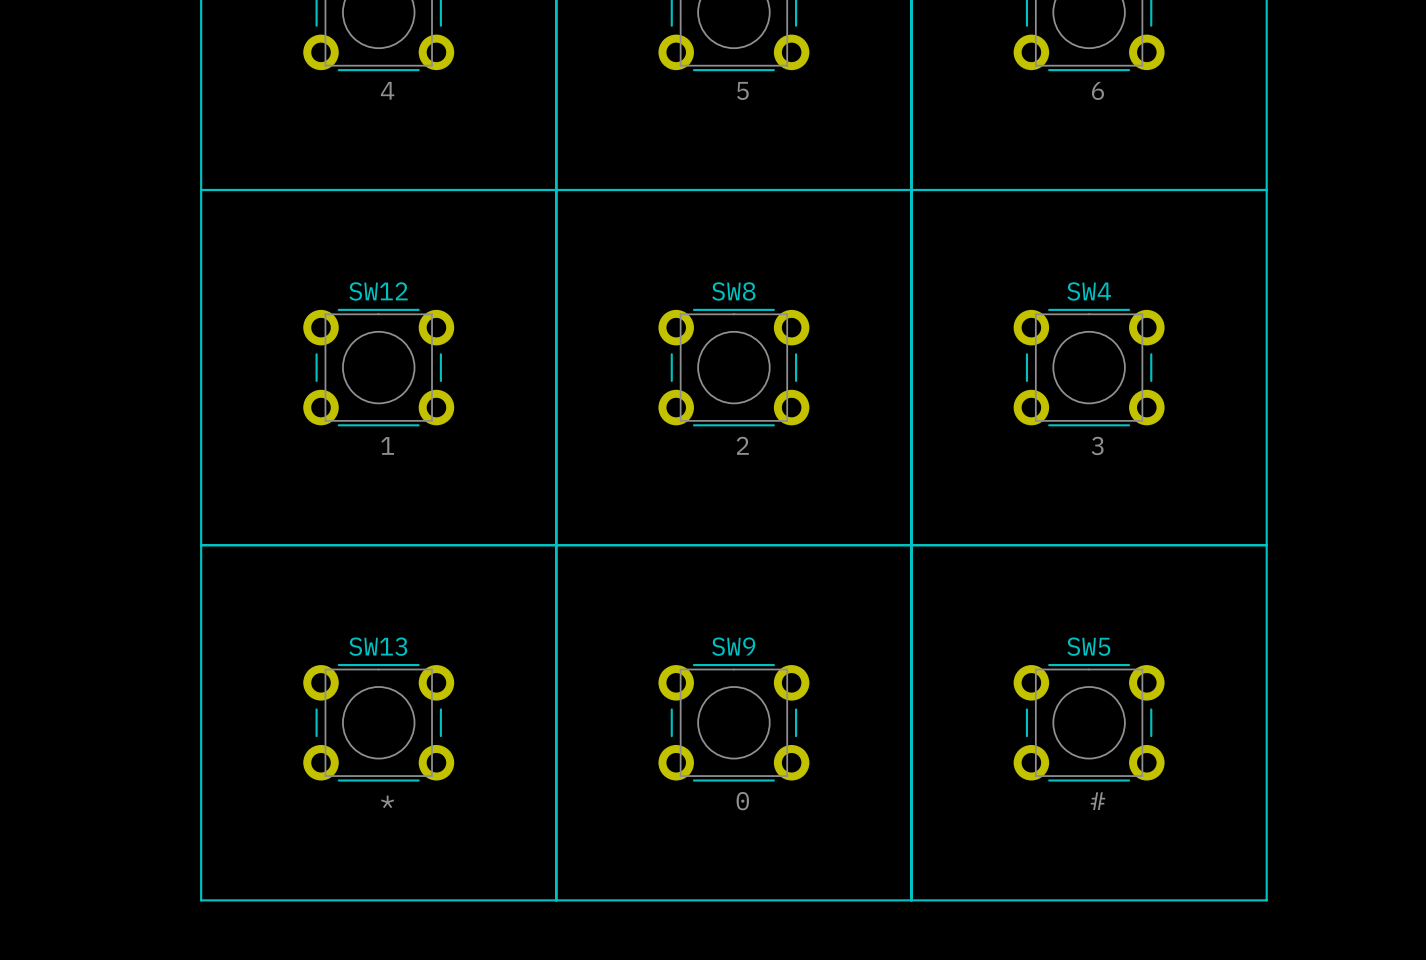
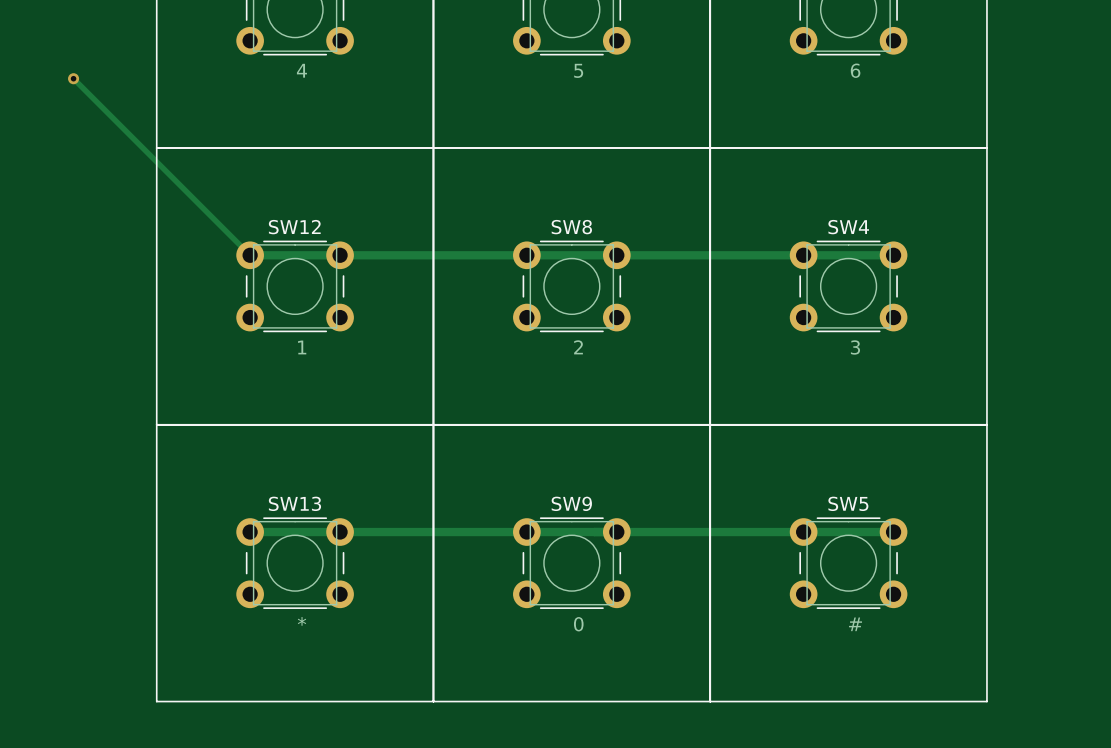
track: none -> (73, 78) (250, 255) (893, 255)
via: none -> (73, 78)
track: none -> (250, 532) (893, 532)

